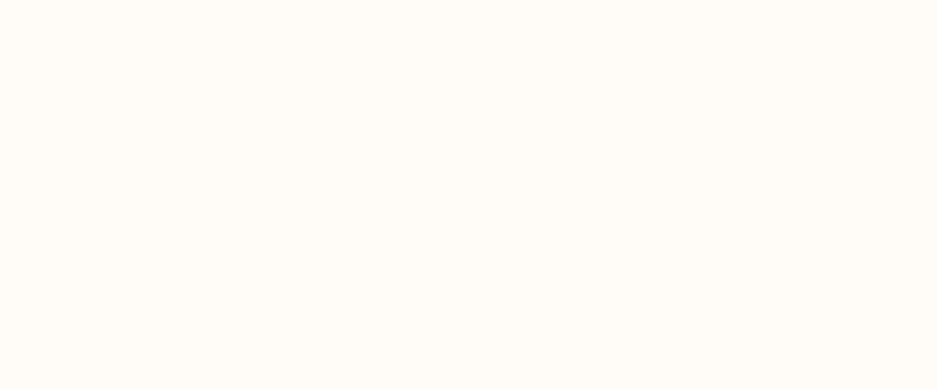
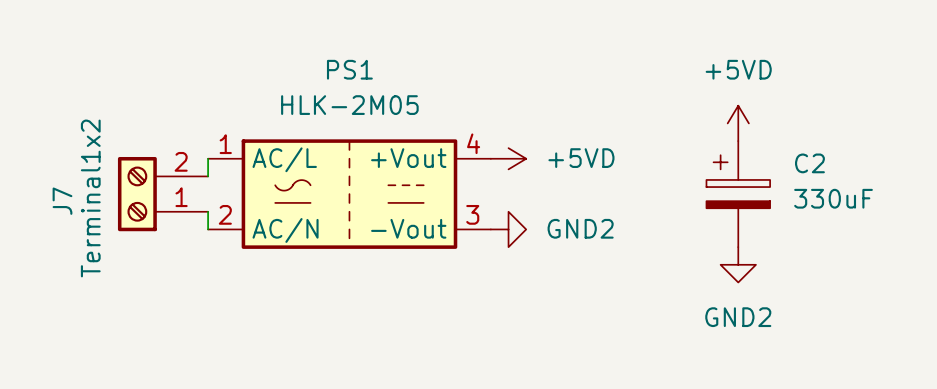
power symbol: none -> +5VD (738, 123)
wire: none -> (208, 158) (208, 176)
power symbol: none -> +5VD (508, 158)
J7: none -> Terminal1x2 (163, 194)
PS1: none -> HLK-2M05 (349, 194)
C2: none -> 330uF (738, 194)
wire: none -> (208, 211) (208, 229)
power symbol: none -> GND2 (508, 229)
power symbol: none -> GND2 (738, 264)

